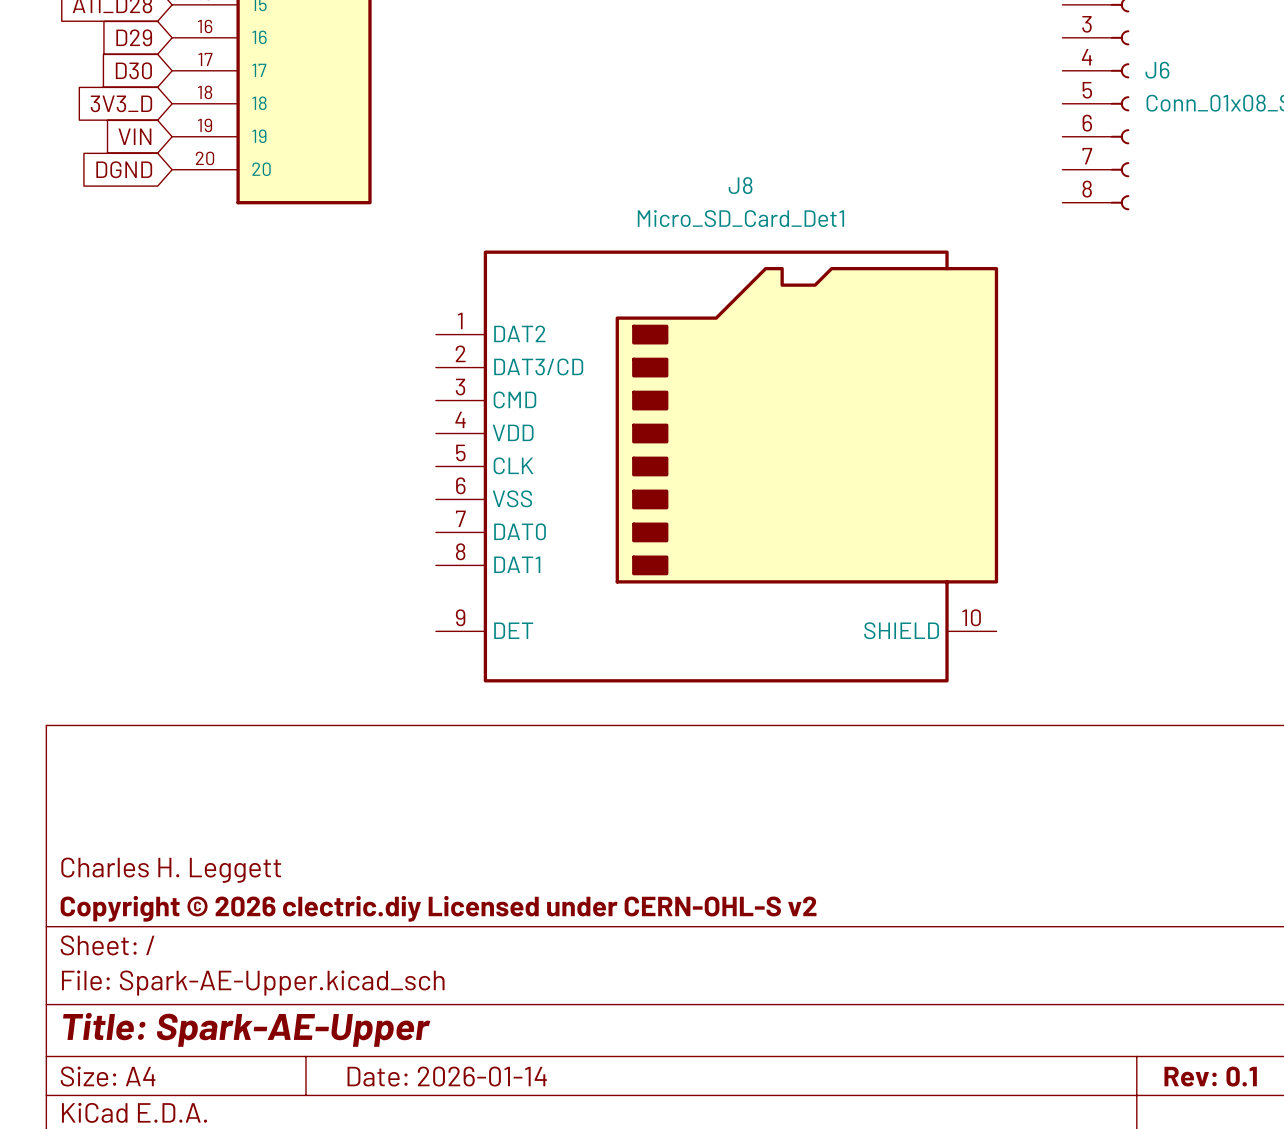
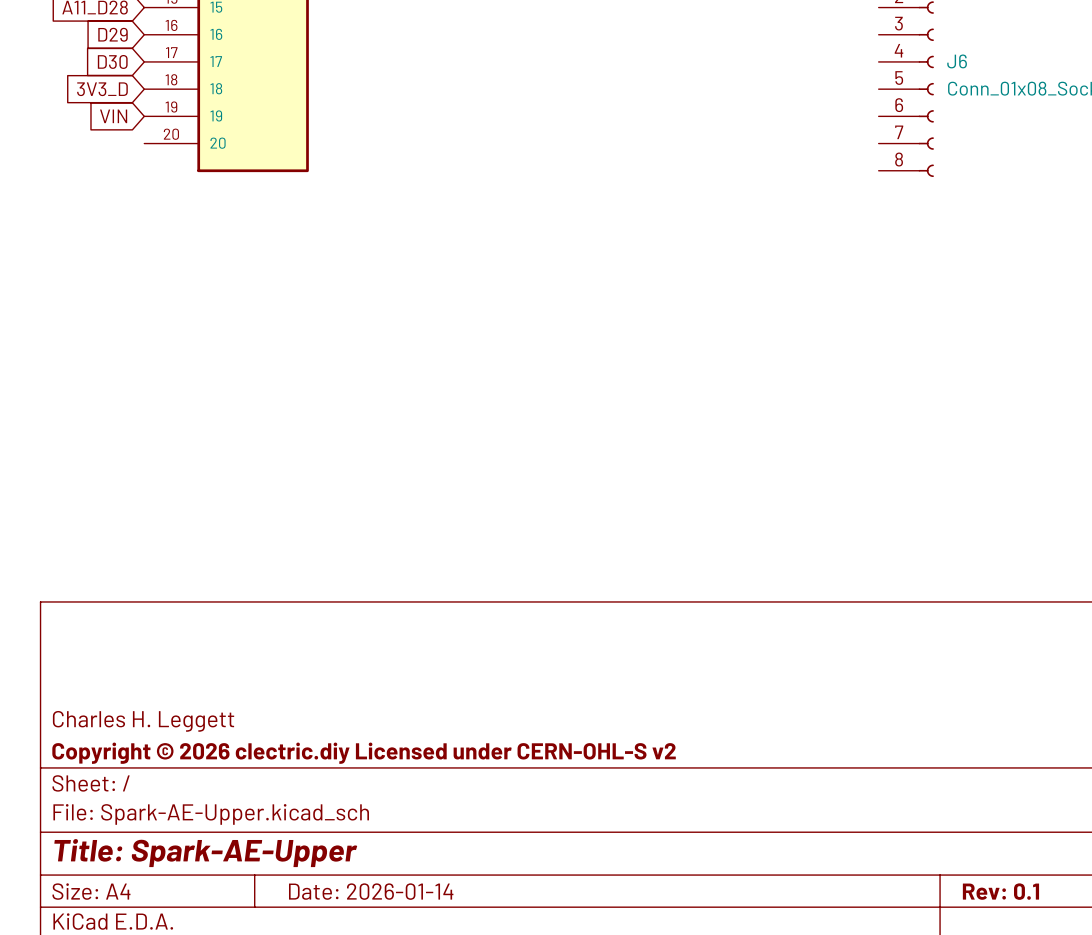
global label: DGND (124, 169) -> none
J8: Micro_SD_Card_Det1 (717, 466) -> none

